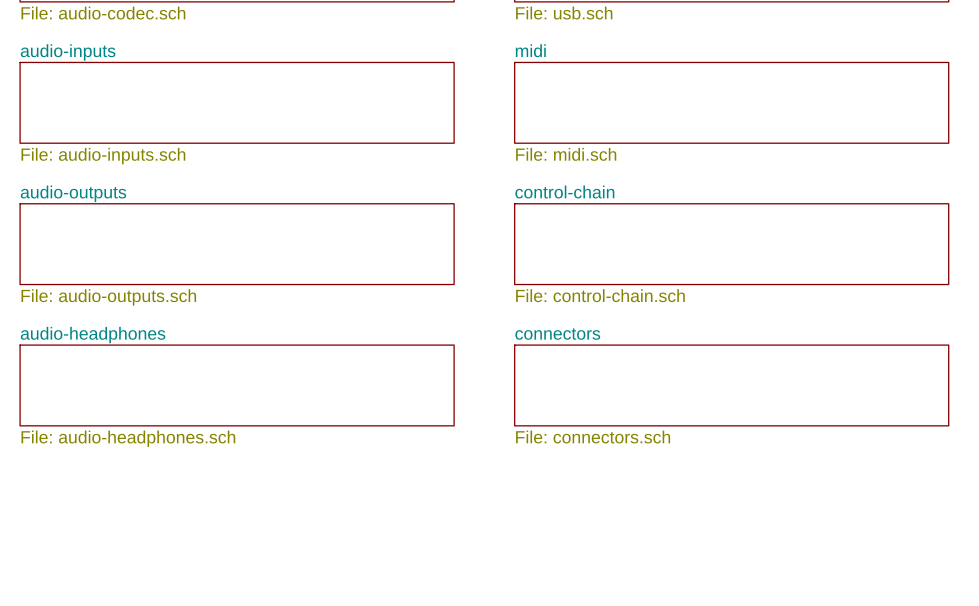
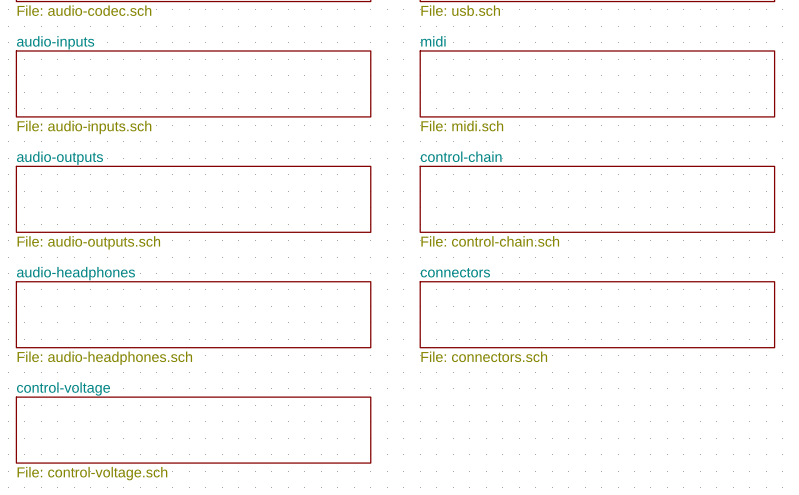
sheet control-voltage: none -> File: control-voltage.sch (193, 430)

